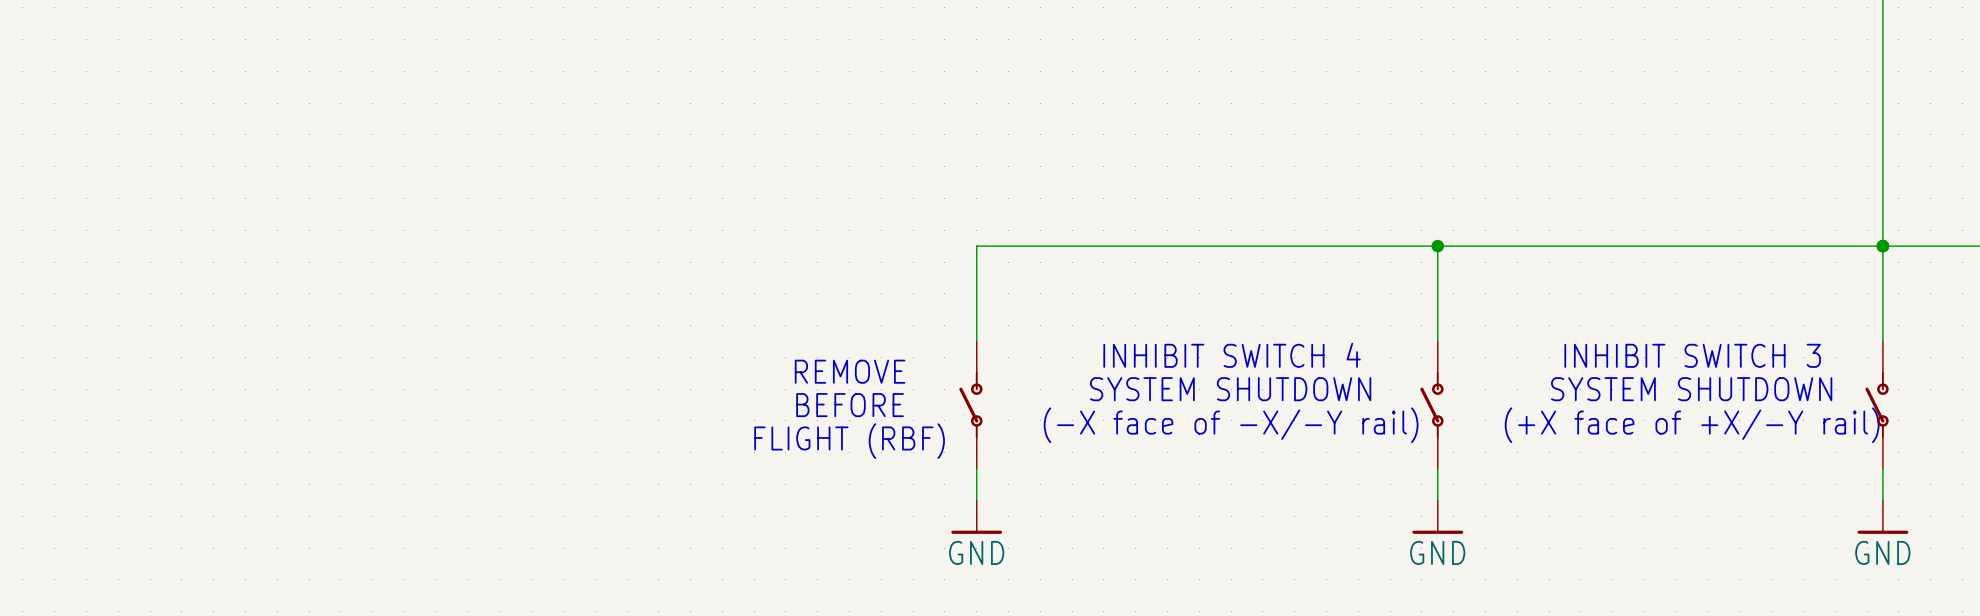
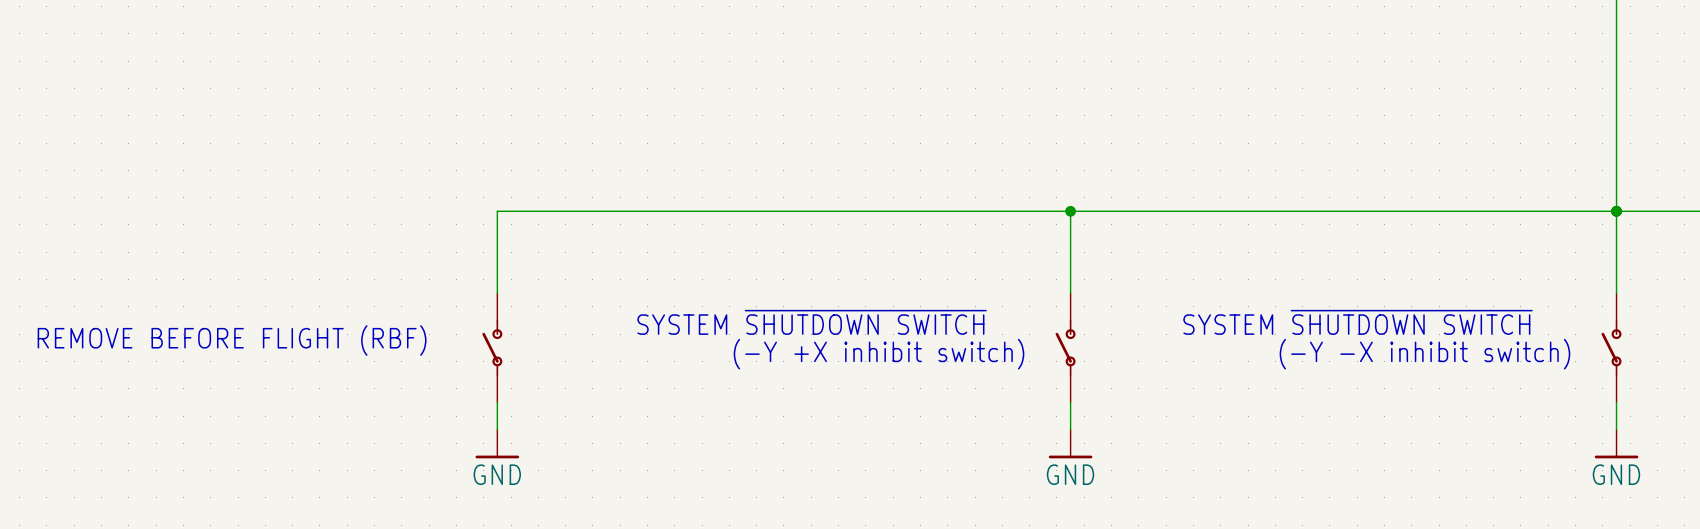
wire: (976, 246) (976, 341) -> (838, 211) (497, 211) (497, 293)
junction: none -> (1070, 211)
wire: (1437, 246) (1437, 341) -> (1070, 211) (1070, 293)
junction: (1437, 246) -> none
text: INHIBIT SWITCH 4 (1232, 355) -> none
text: INHIBIT SWITCH 3 (1692, 355) -> none
text: REMOVE (850, 371) -> none
text: none -> SYSTEM ~{SHUTDOWN SWITCH} (812, 322)
text: SYSTEM SHUTDOWN (1230, 389) -> SYSTEM ~{SHUTDOWN SWITCH} (1358, 322)
text: SYSTEM SHUTDOWN (1691, 389) -> none
text: none -> REMOVE BEFORE FLIGHT (RBF) (232, 340)
part: none -> (492, 347)
text: BEFORE (850, 405) -> none
part: (970, 405) -> none
part: none -> (1065, 347)
part: (1431, 405) -> none
text: none -> (-Y +X inhibit switch) (879, 354)
text: none -> (-Y -X inhibit switch) (1424, 354)
text: (-X face of -X/-Y rail) (1231, 425) -> none
text: (+X face of +X/-Y rail) (1692, 425) -> none
text: FLIGHT (RBF) (849, 441) -> none
wire: none -> (497, 402) (497, 429)
wire: (976, 468) (976, 500) -> none
wire: (1437, 468) (1437, 500) -> (1070, 402) (1070, 429)
power symbol: none -> GND (497, 443)
power symbol: GND (976, 517) -> none
power symbol: none -> GND (1070, 443)
power symbol: GND (1437, 517) -> none

